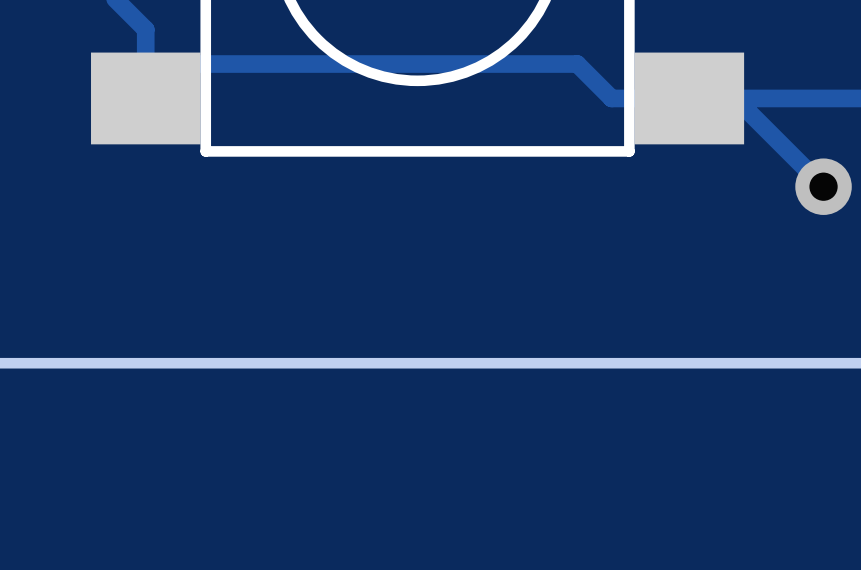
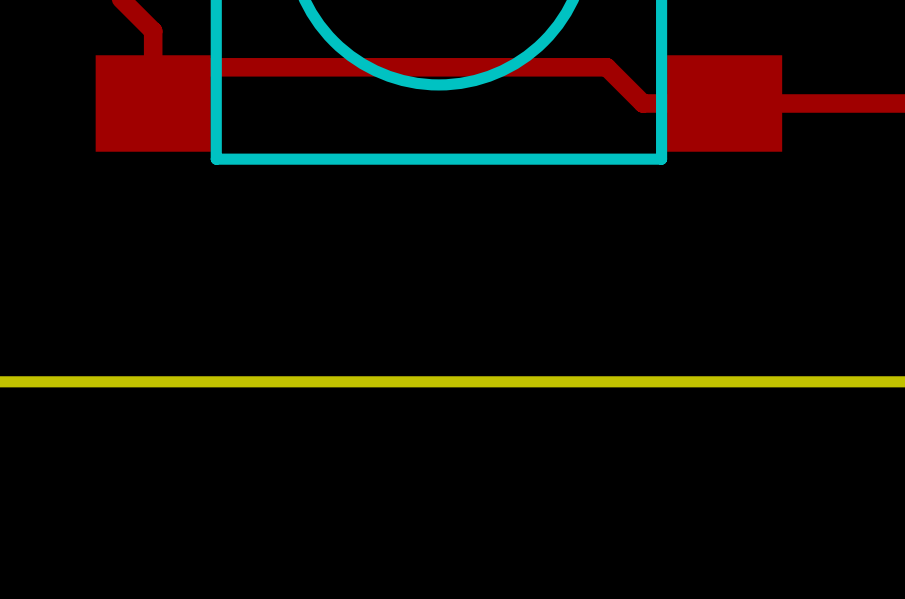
track: (735, 98) (823, 186) -> none
via: (823, 186) -> none

